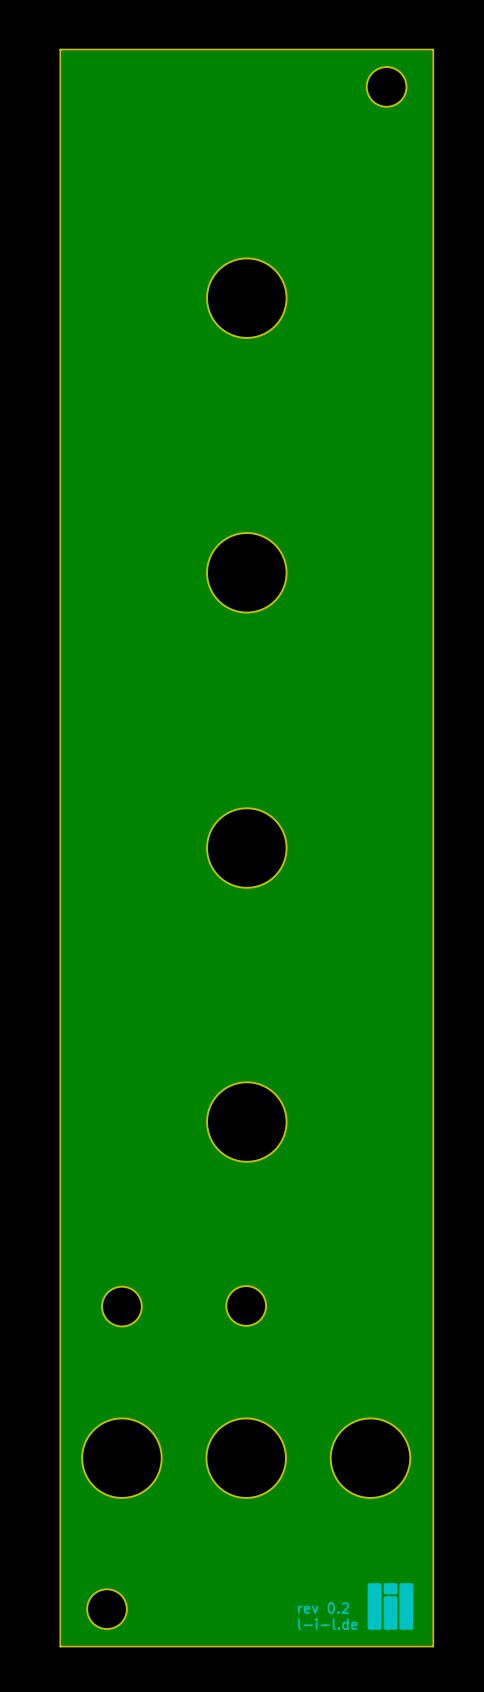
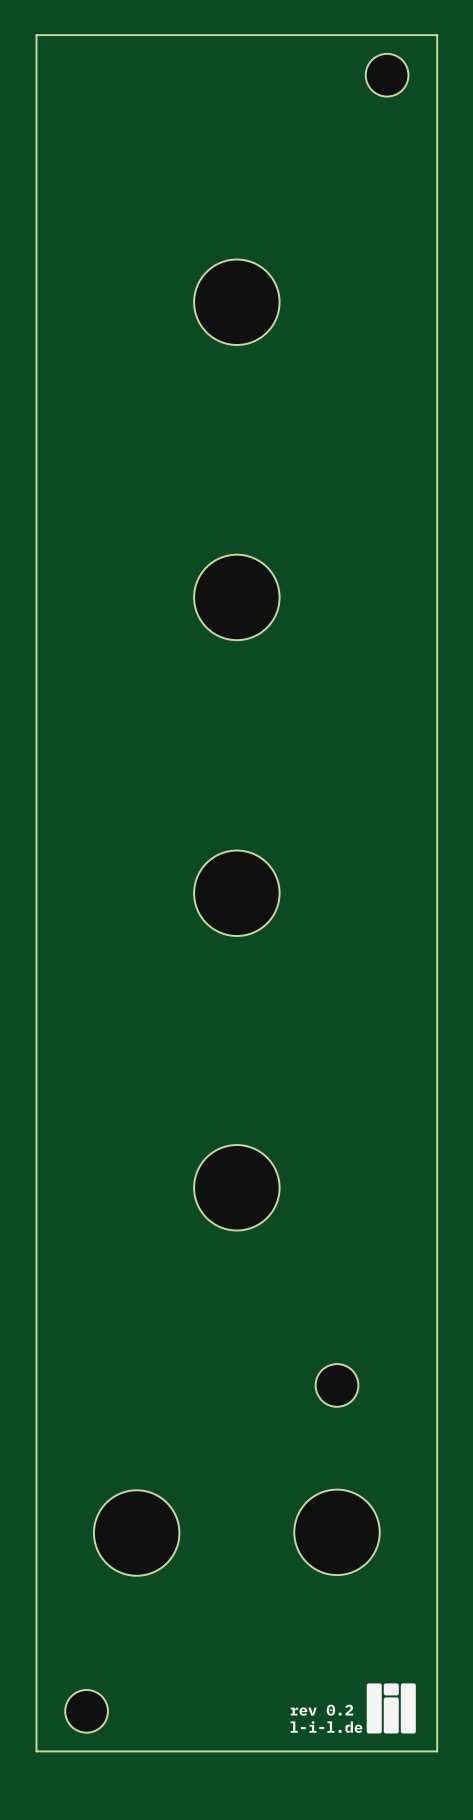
drawing: [61, 50, 432, 1646] -> none
part position: (246, 1305) -> (337, 1385)
part: (121, 1306) -> none
part position: (121, 1458) -> (136, 1533)
part: (246, 1458) -> none
part position: (370, 1458) -> (337, 1532)

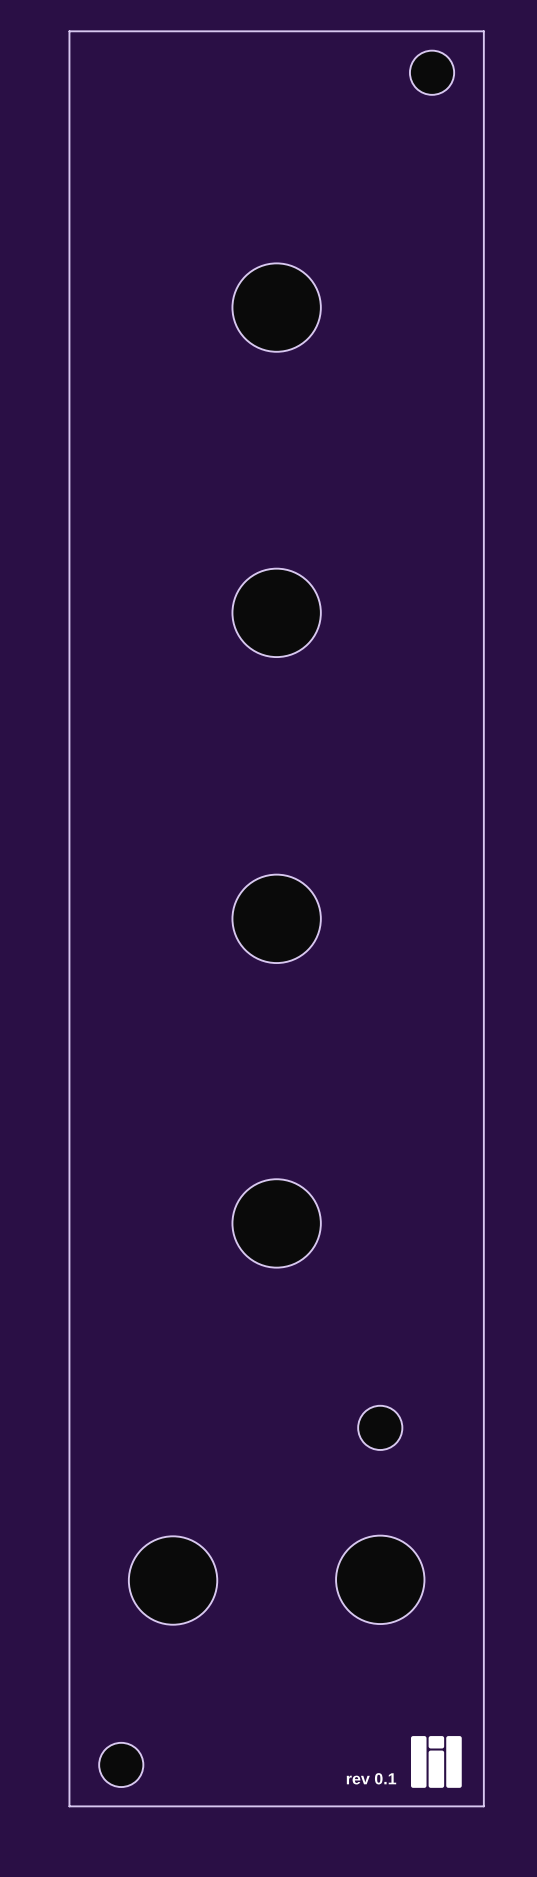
text: rev 0.2 (321, 1710) -> rev 0.1 (371, 1778)
text: l-i-l.de (326, 1727) -> none

